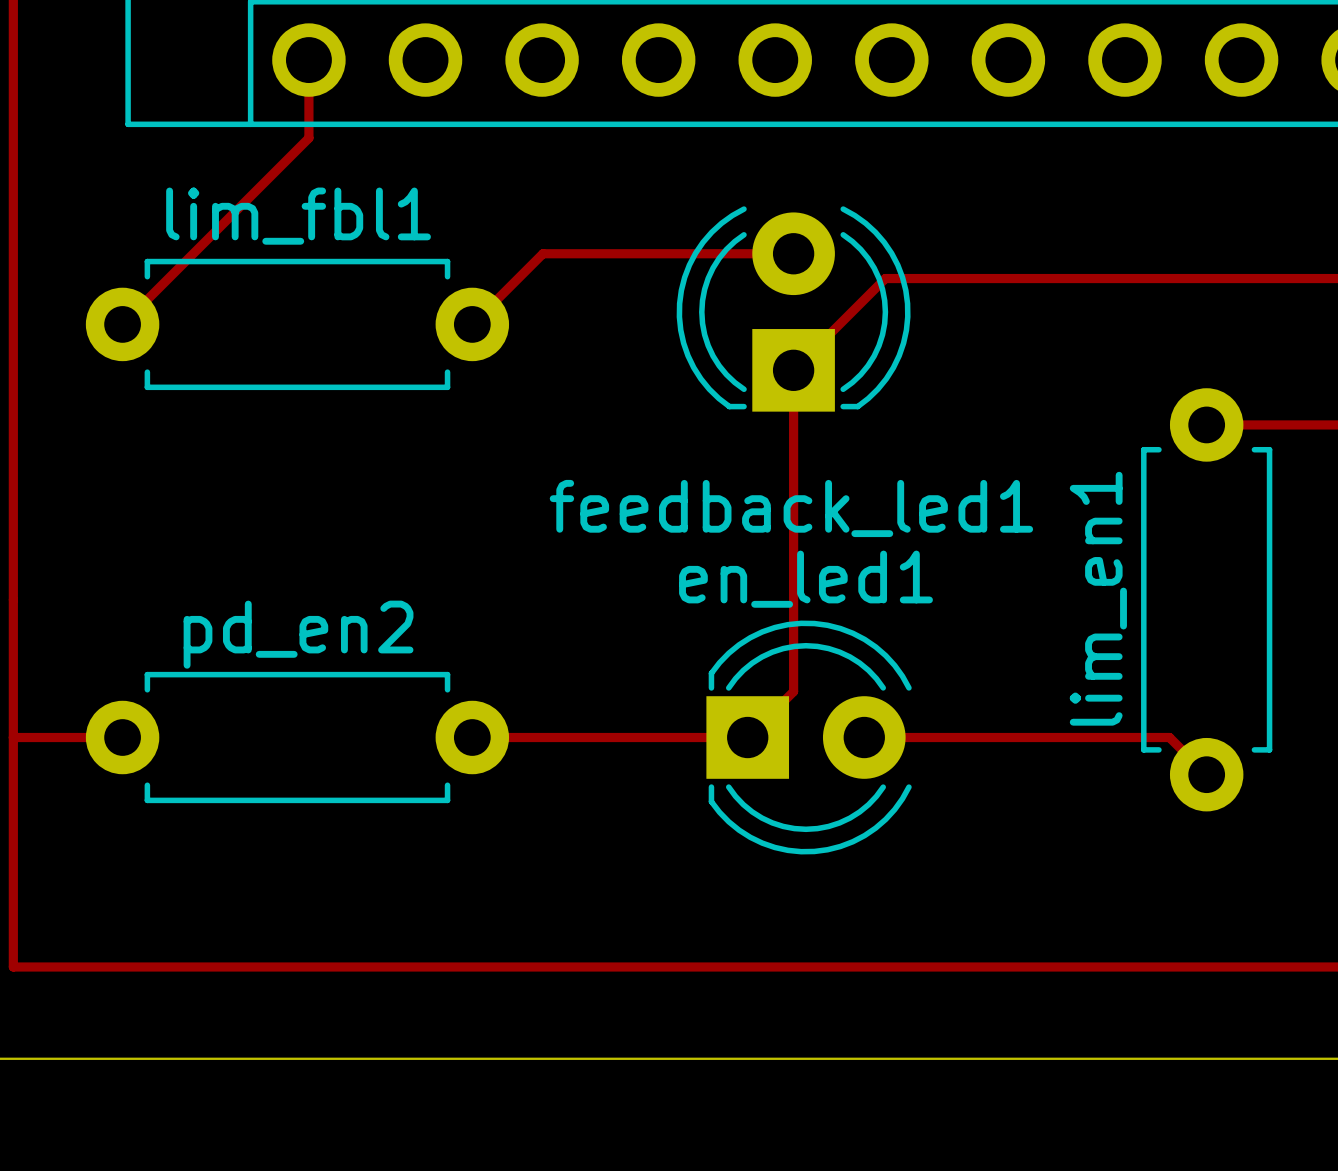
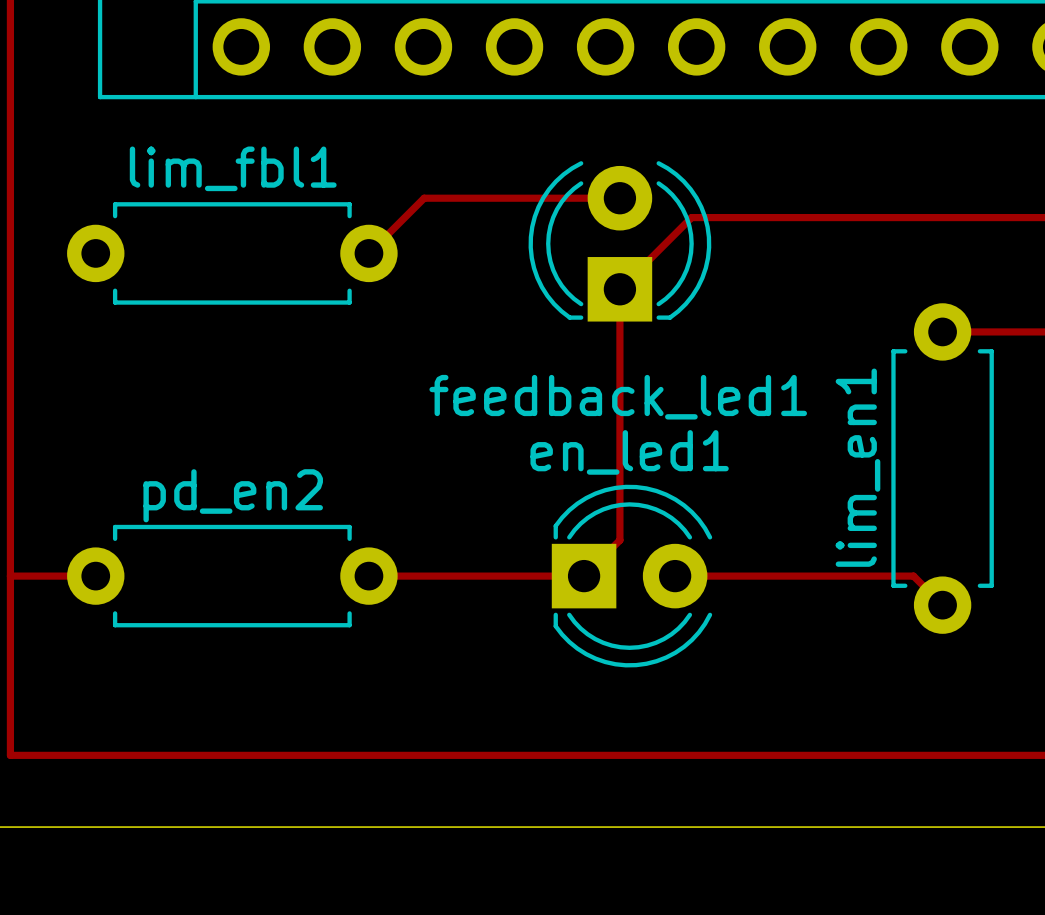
track: (308, 60) (308, 138) (122, 324) -> none

